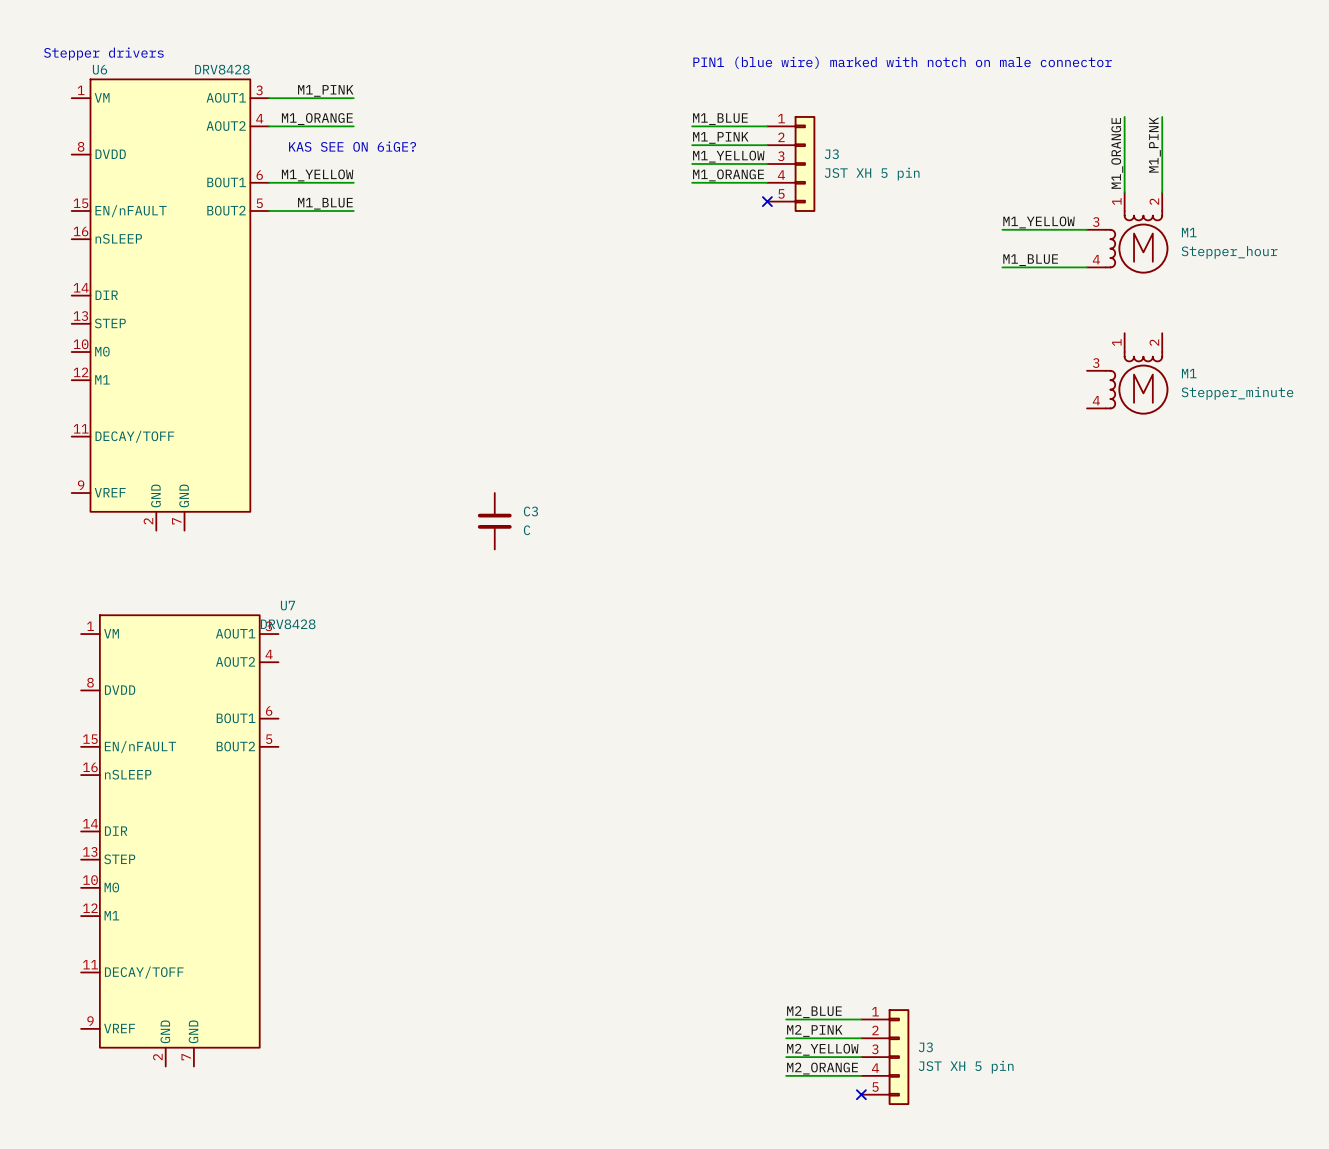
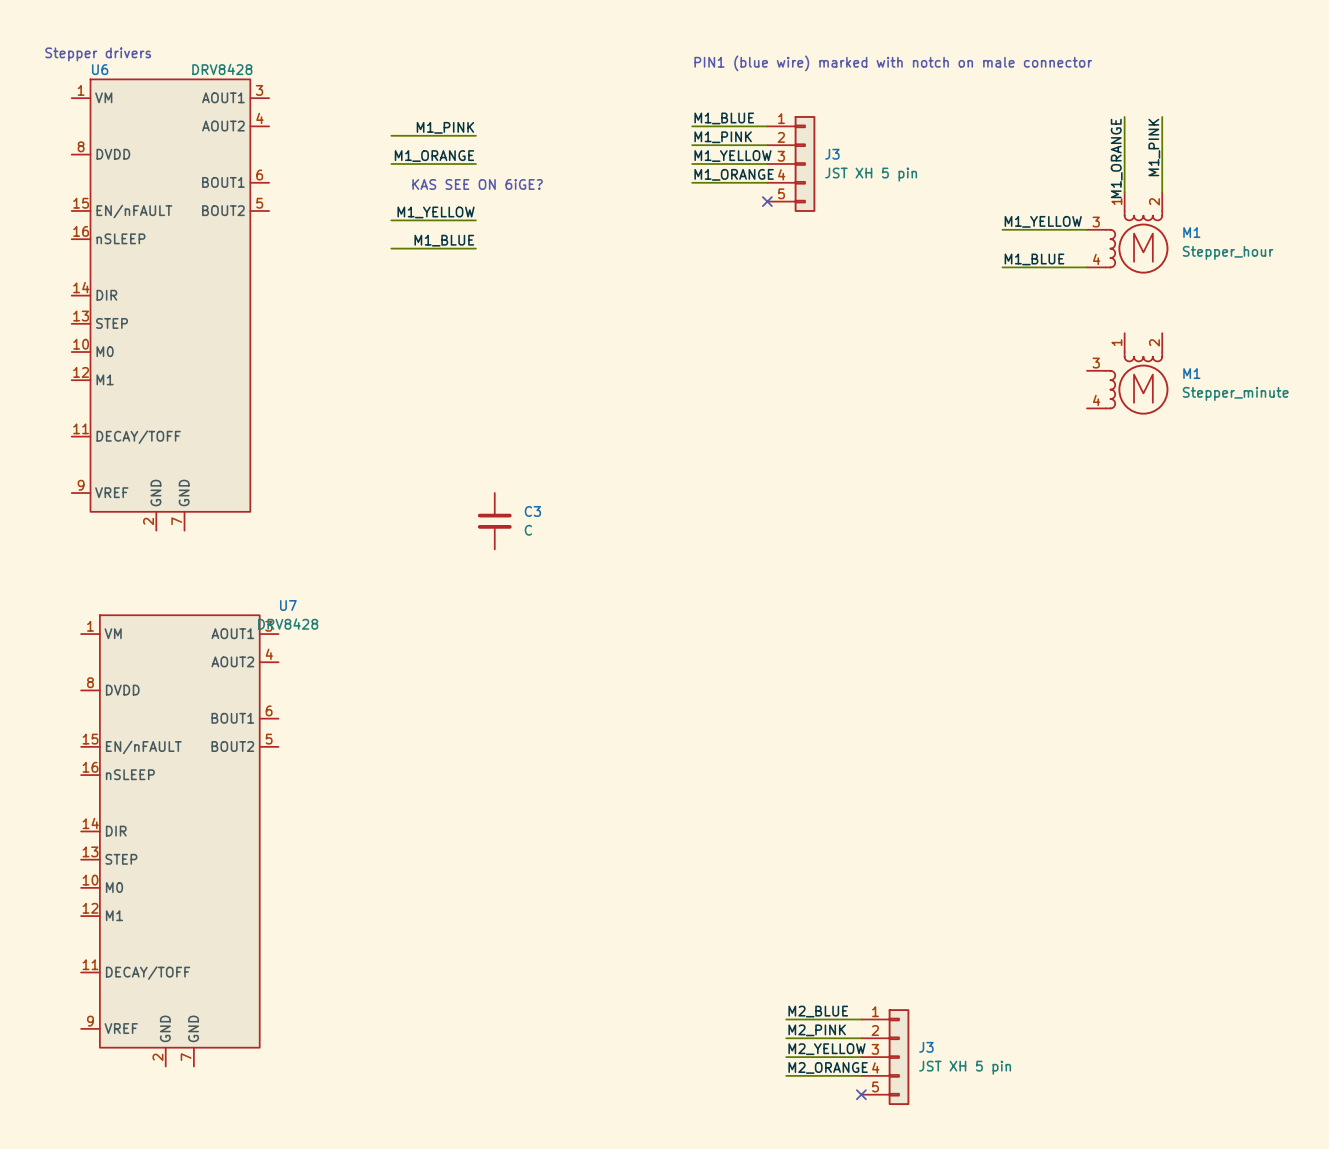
label position: M1_PINK (325, 90) -> M1_PINK (445, 127)
wire: (269, 98) (353, 98) -> (391, 135) (475, 135)
label position: M1_ORANGE (317, 119) -> M1_ORANGE (434, 156)
wire: (269, 126) (353, 126) -> (391, 163) (475, 163)
text position: KAS SEE ON 6iGE? (352, 146) -> KAS SEE ON 6iGE? (477, 184)
label position: M1_YELLOW (317, 175) -> M1_YELLOW (436, 212)
wire: (269, 182) (353, 182) -> (391, 220) (475, 220)
label position: M1_BLUE (325, 203) -> M1_BLUE (444, 240)
wire: (269, 210) (353, 210) -> (391, 248) (475, 248)

